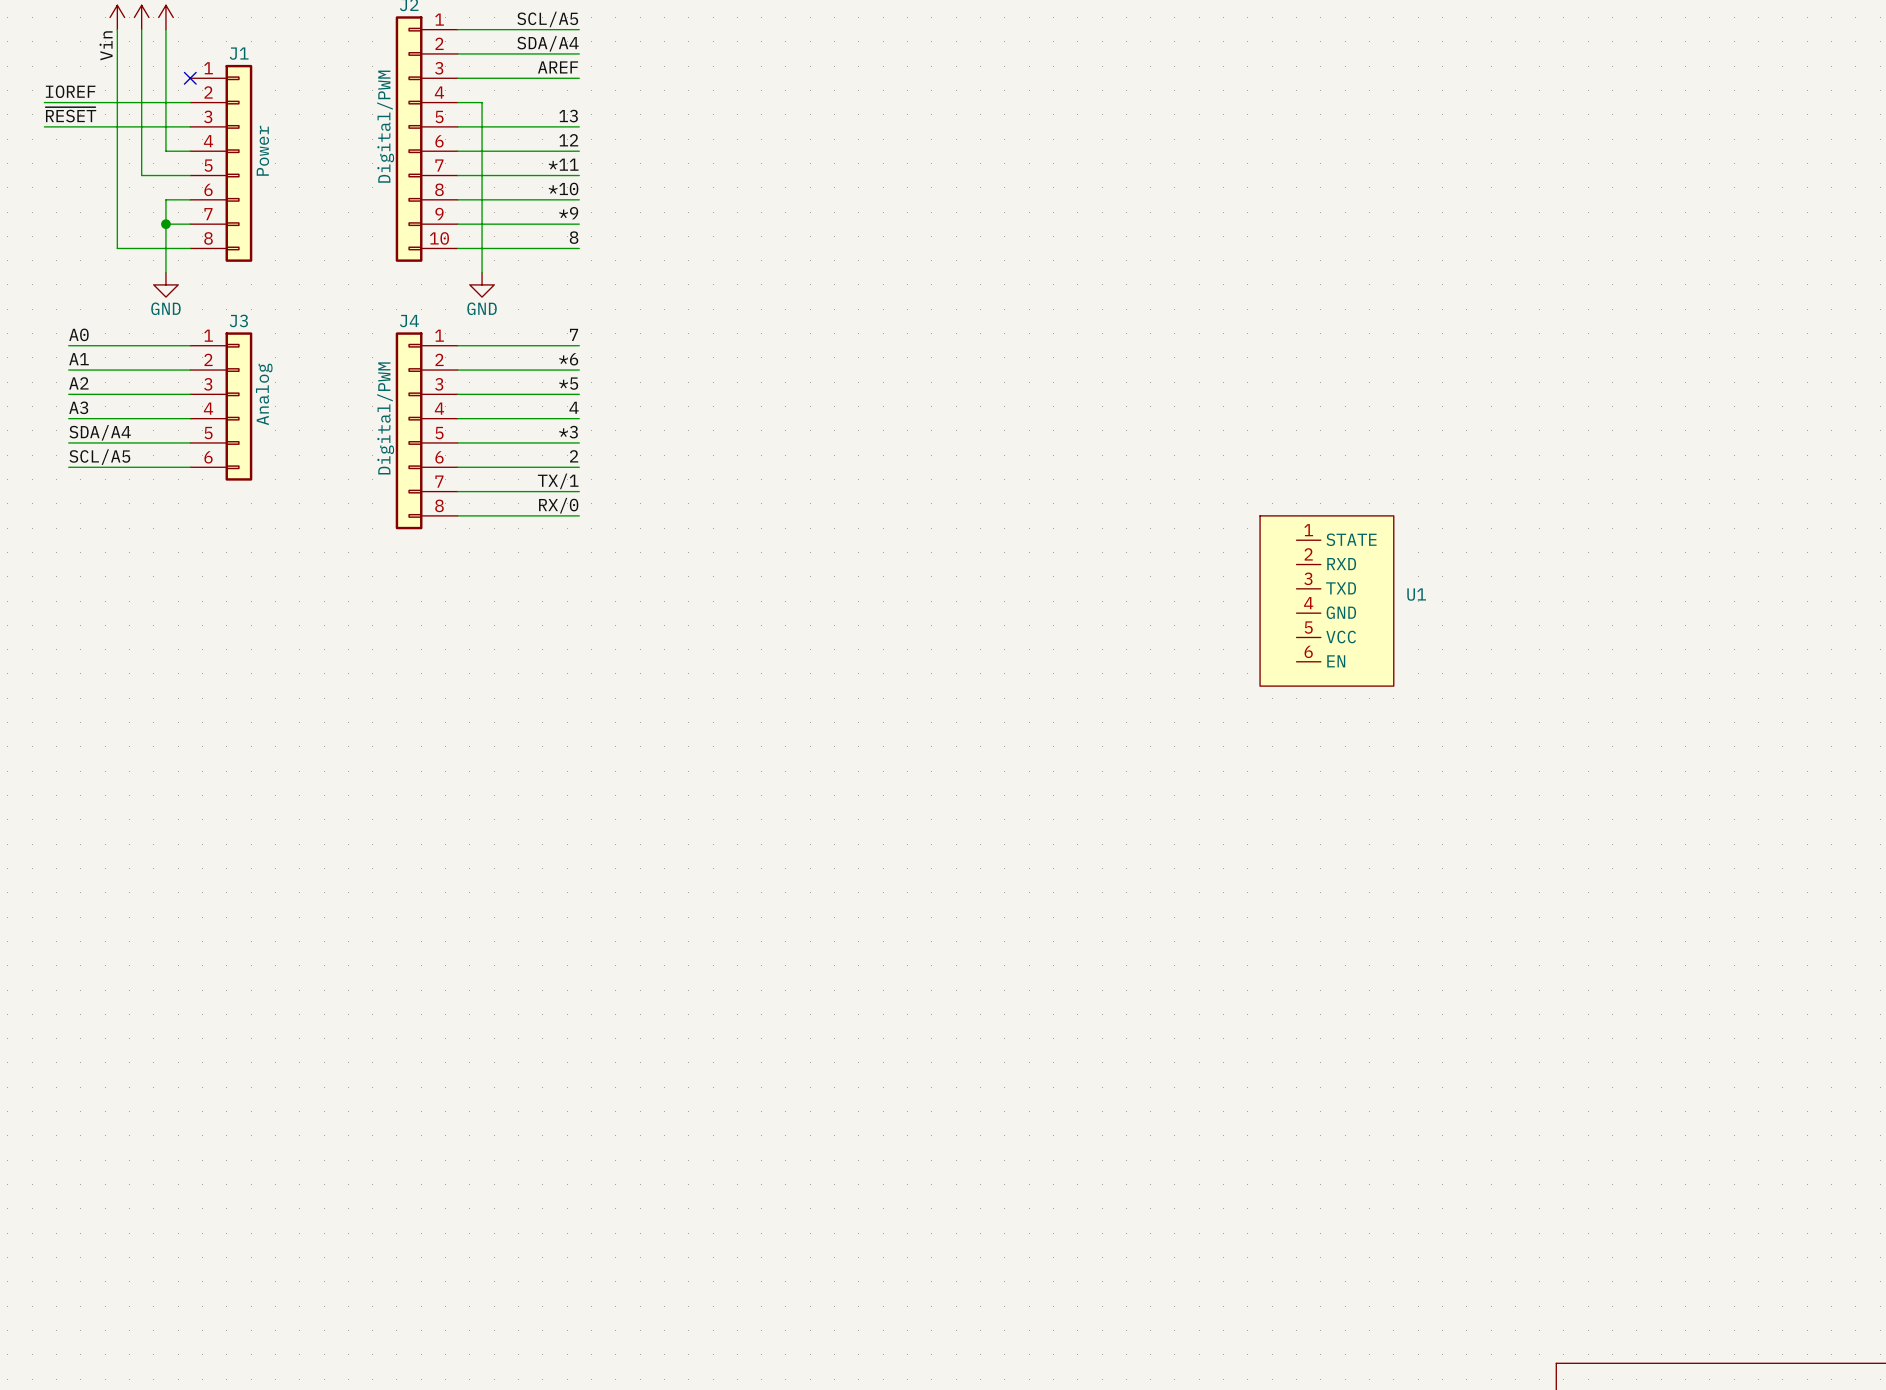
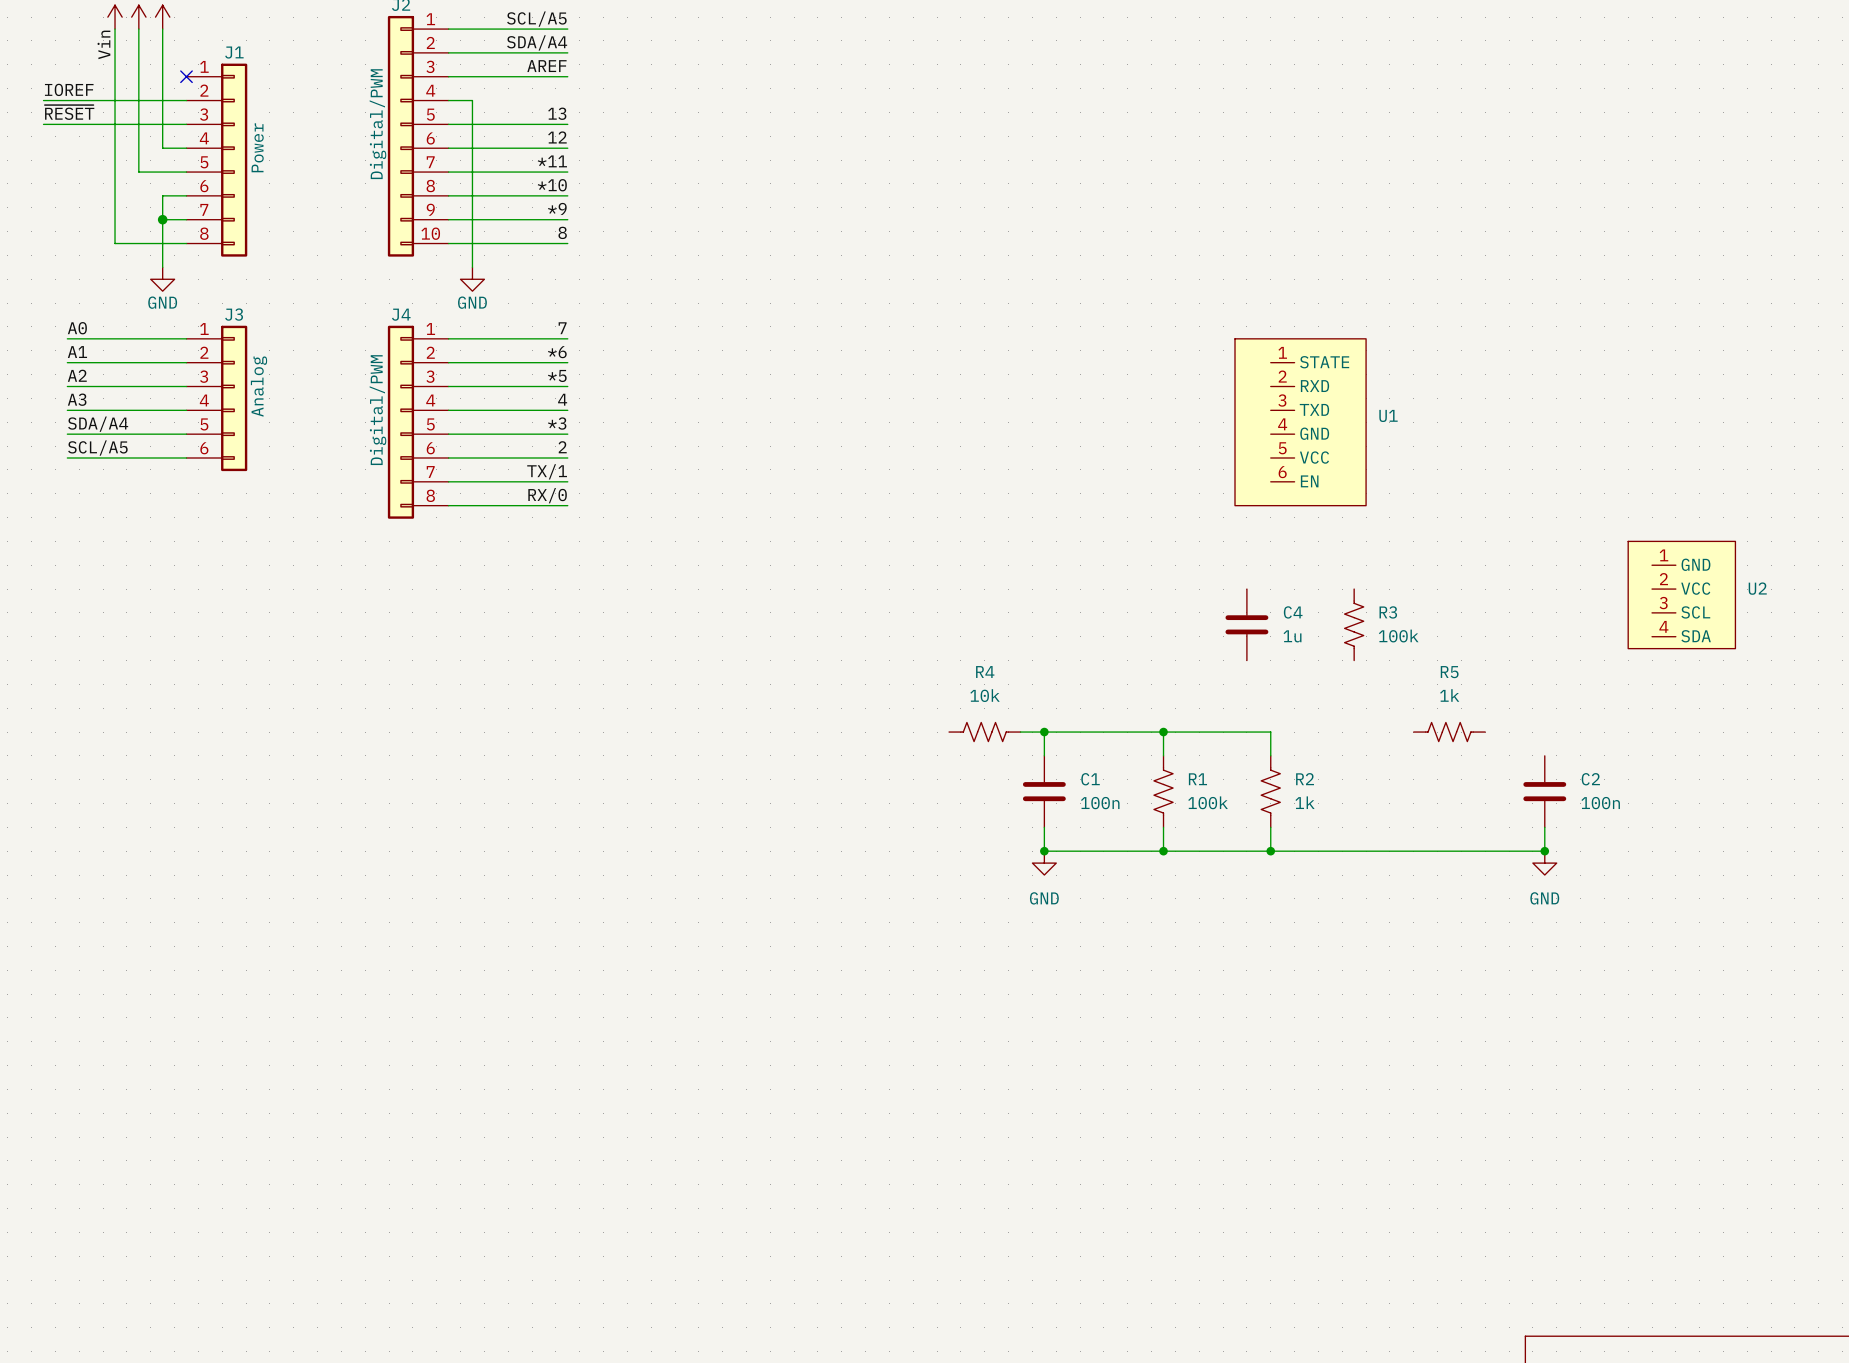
U1 position: (1326, 601) -> (1300, 422)
U2: none -> (1681, 595)
C4: none -> 1u (1246, 624)
R3: none -> 100k (1354, 624)
R4: none -> 10k (984, 732)
wire: none -> (1020, 732) (1270, 732) (1270, 755)
wire: none -> (1044, 732) (1044, 755)
junction: none -> (1044, 732)
wire: none -> (1163, 732) (1163, 755)
junction: none -> (1163, 732)
R5: none -> 1k (1449, 732)
C1: none -> 100n (1044, 791)
R1: none -> 100k (1163, 791)
R2: none -> 1k (1270, 791)
C2: none -> 100n (1544, 791)
wire: none -> (1044, 827) (1044, 851) (1544, 851) (1544, 827)
wire: none -> (1163, 827) (1163, 851)
wire: none -> (1270, 827) (1270, 851)
junction: none -> (1044, 851)
junction: none -> (1163, 851)
junction: none -> (1270, 851)
junction: none -> (1544, 851)
power symbol: none -> GND (1044, 863)
power symbol: none -> GND (1544, 863)

